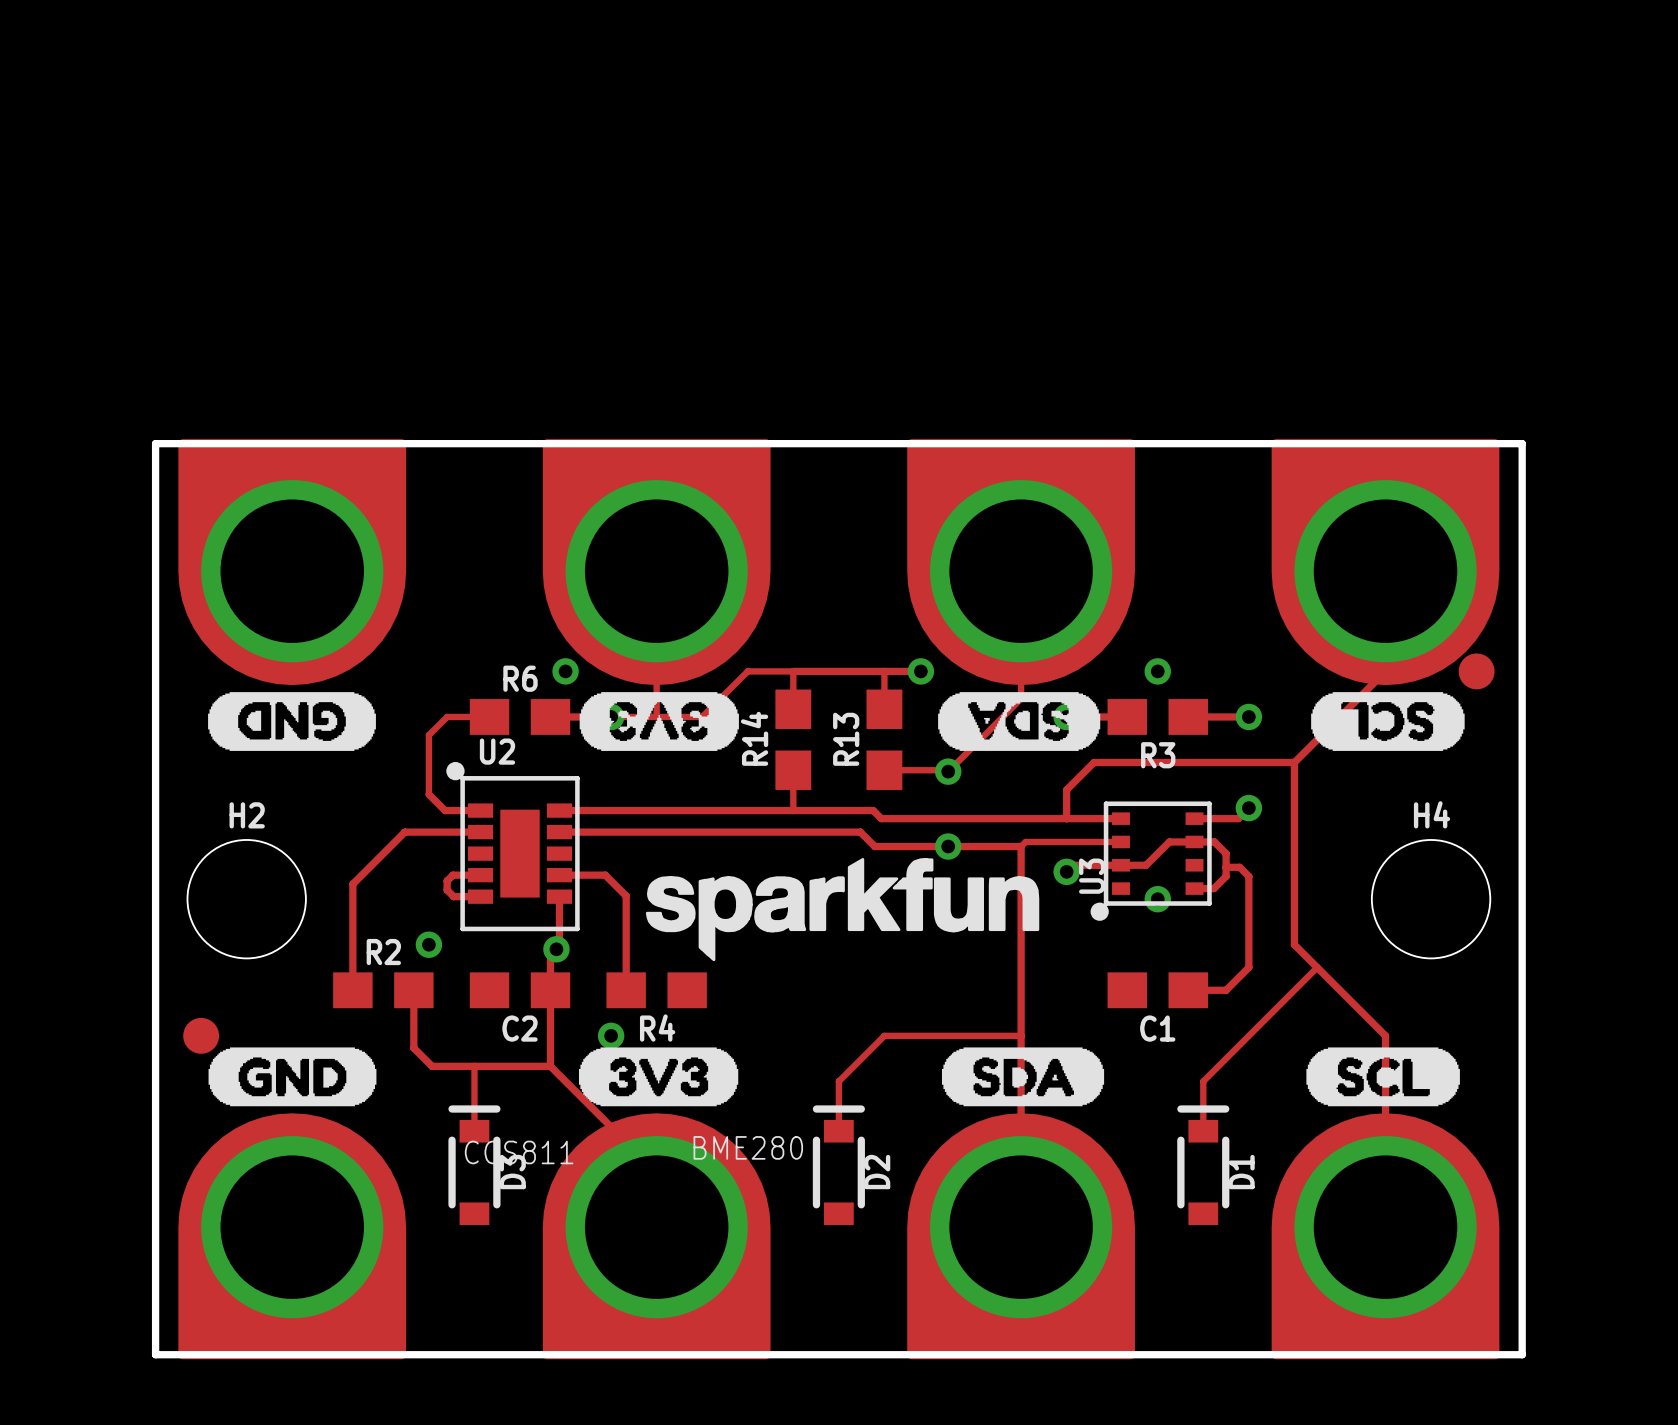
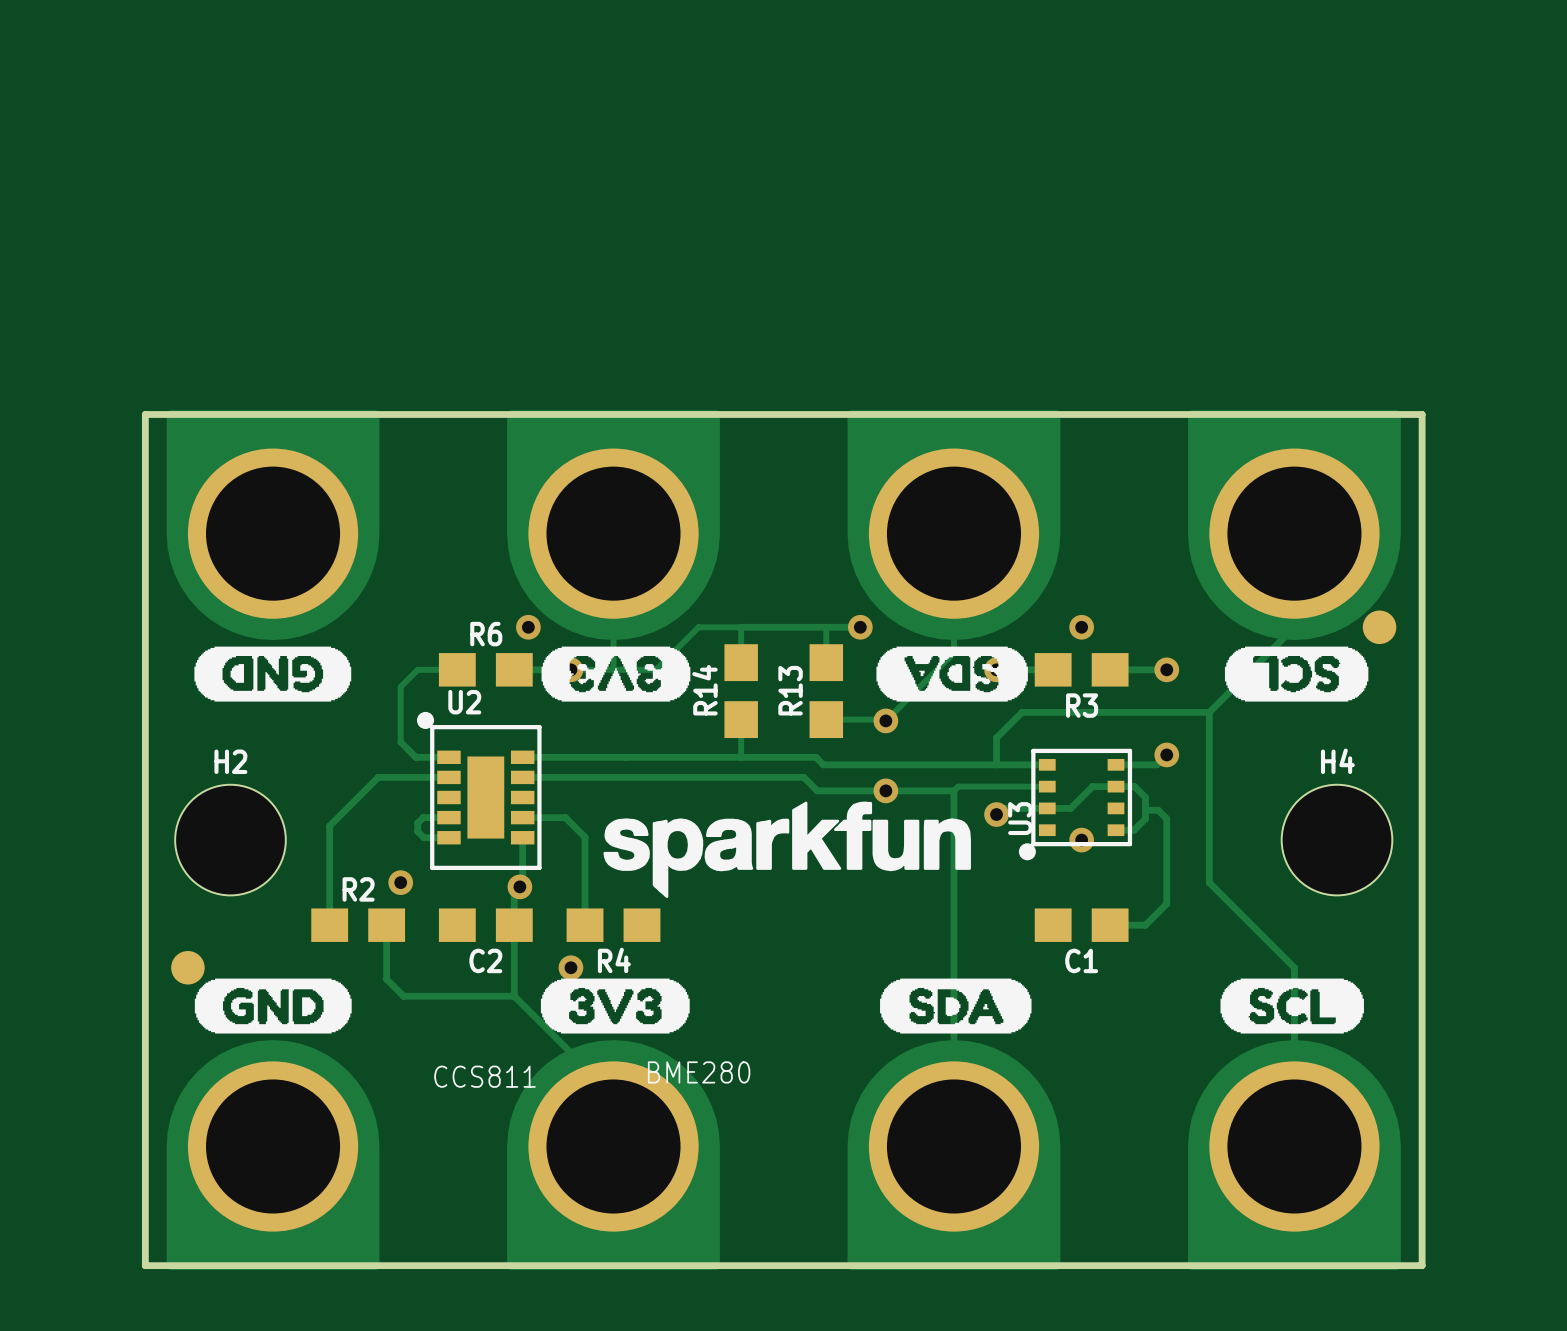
track: (1317, 967) (1203, 1081) (1203, 1131) -> none
track: (1021, 1035) (884, 1035) (838, 1081) (838, 1131) -> none
track: (474, 1066) (474, 1131) -> none
D3: (474, 1165) -> none
D2: (838, 1165) -> none
D1: (1203, 1165) -> none

